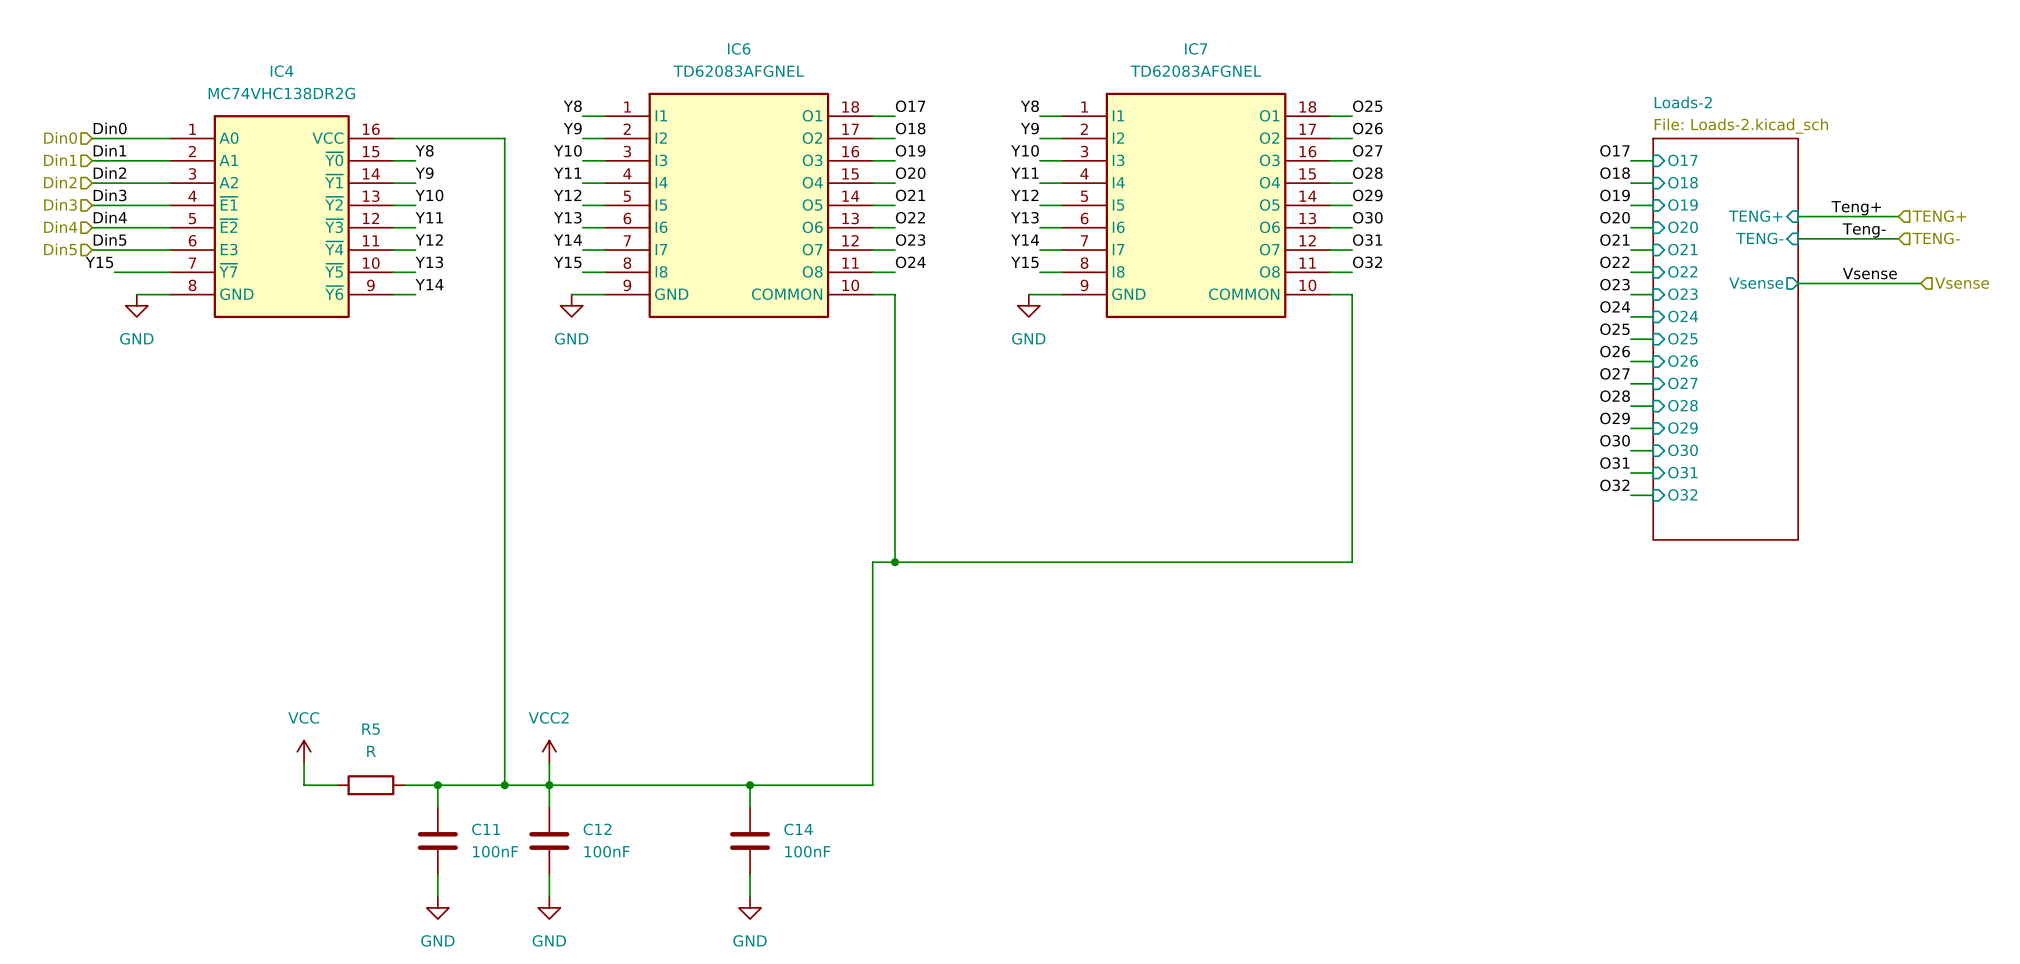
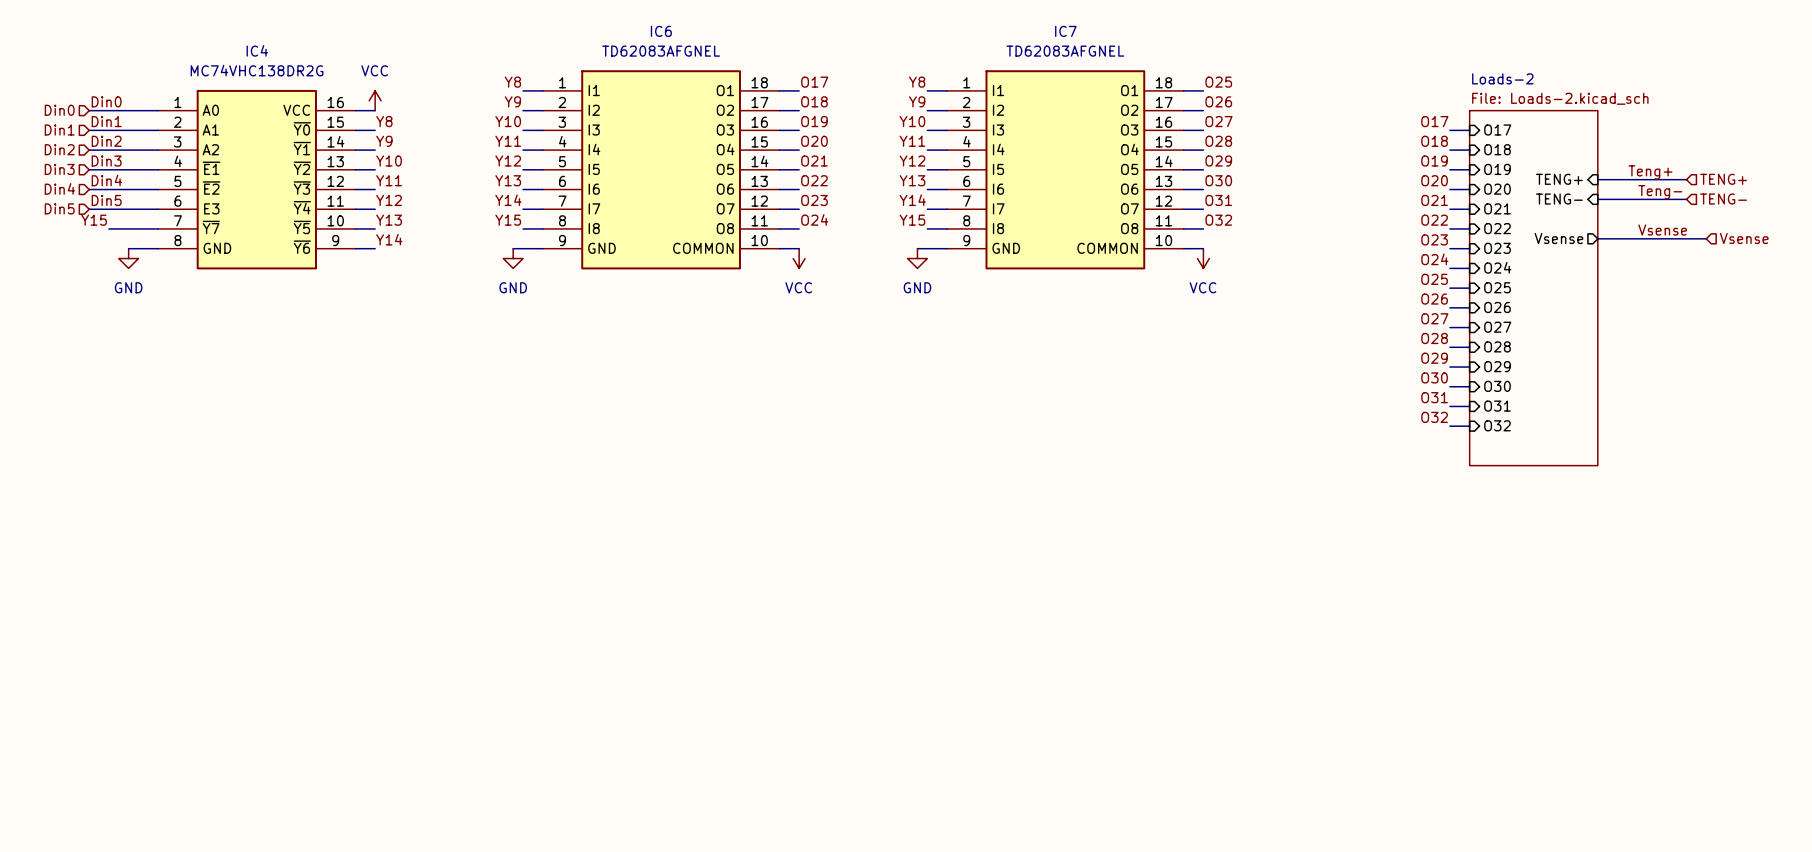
power symbol: none -> VCC (375, 100)
wire: (415, 138) (504, 138) (504, 785) -> none
wire: (895, 294) (895, 562) -> none
wire: (1352, 294) (1352, 562) (872, 562) (872, 785) (404, 785) -> none
power symbol: none -> VCC (799, 258)
power symbol: none -> VCC (1203, 258)
junction: (895, 562) -> none
power symbol: VCC (304, 751) -> none
power symbol: VCC2 (549, 751) -> none
wire: (304, 762) (304, 785) (337, 785) -> none
wire: (549, 762) (549, 807) -> none
R5: R (370, 785) -> none
wire: (437, 785) (437, 807) -> none
junction: (437, 785) -> none
junction: (504, 785) -> none
junction: (549, 785) -> none
wire: (750, 785) (750, 807) -> none
junction: (750, 785) -> none
C11: 100nF (437, 840) -> none
C12: 100nF (549, 840) -> none
C14: 100nF (750, 840) -> none
wire: (437, 874) (437, 896) -> none
wire: (549, 874) (549, 896) -> none
wire: (750, 874) (750, 896) -> none
power symbol: GND (437, 907) -> none
power symbol: GND (549, 907) -> none
power symbol: GND (750, 907) -> none

